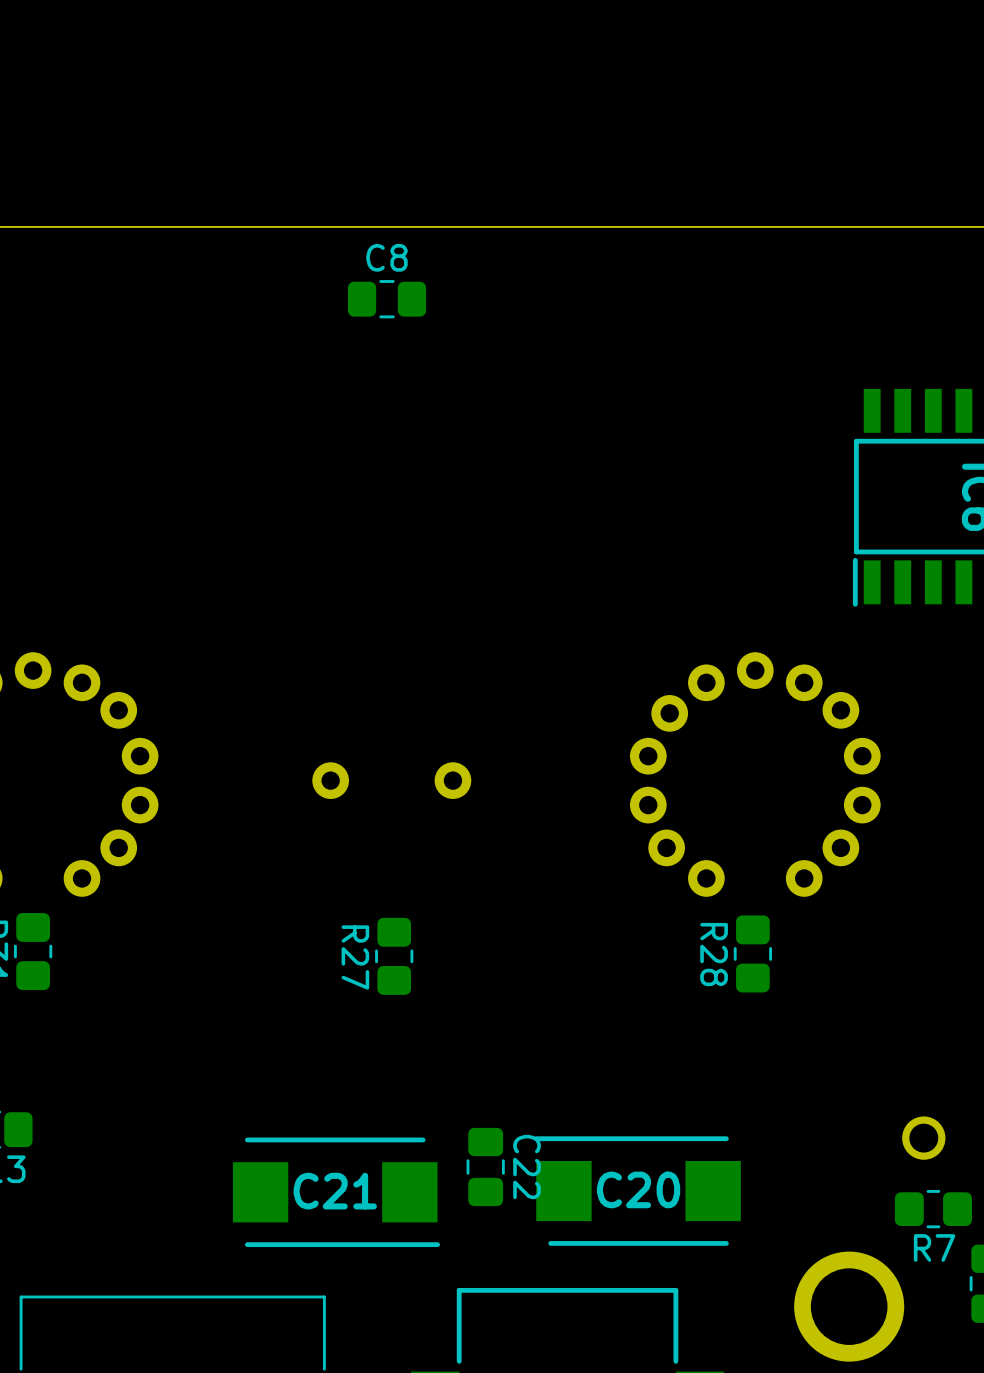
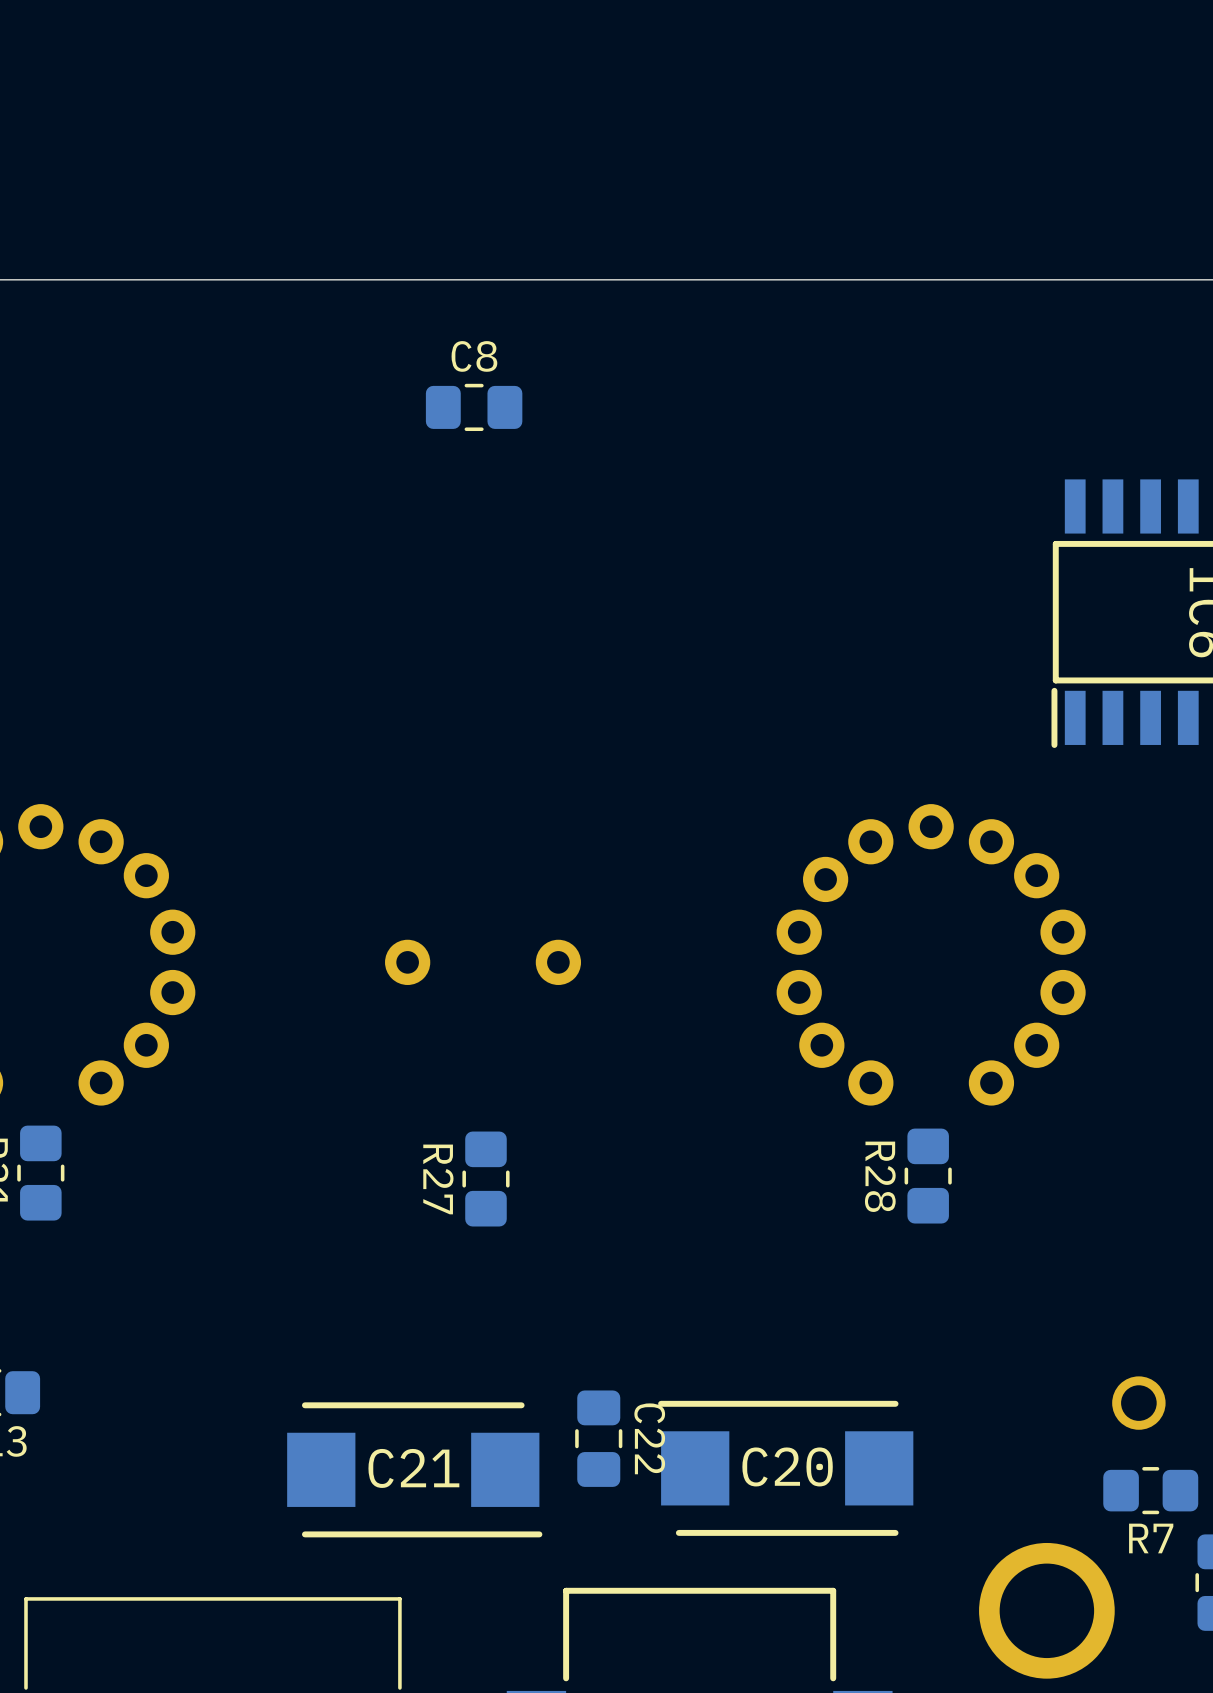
C8 position: (386, 299) -> (474, 407)

